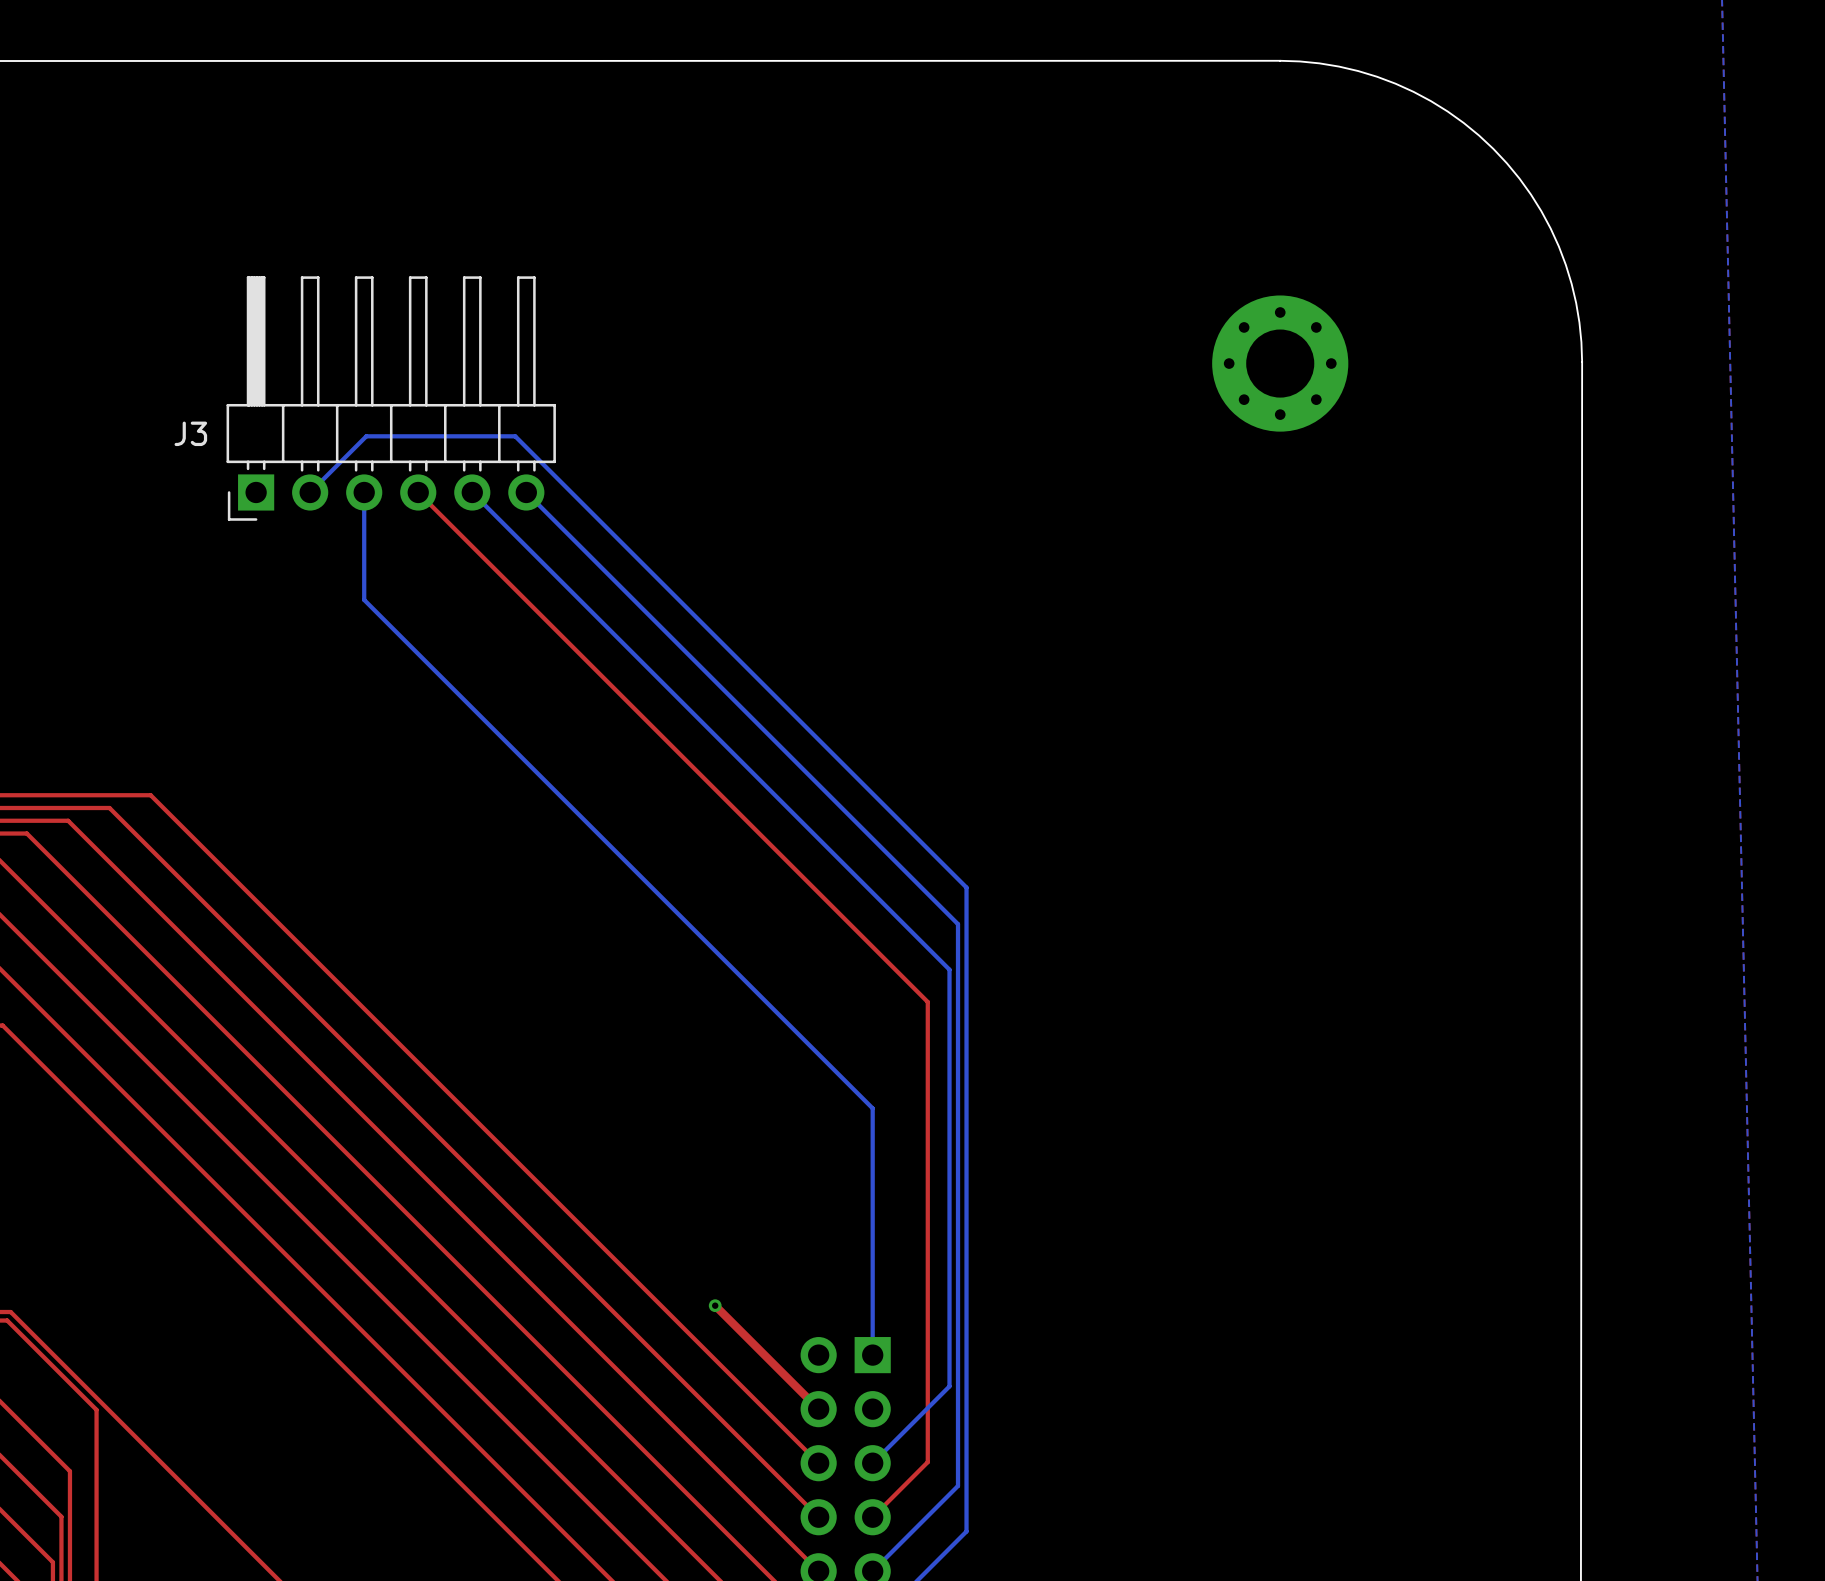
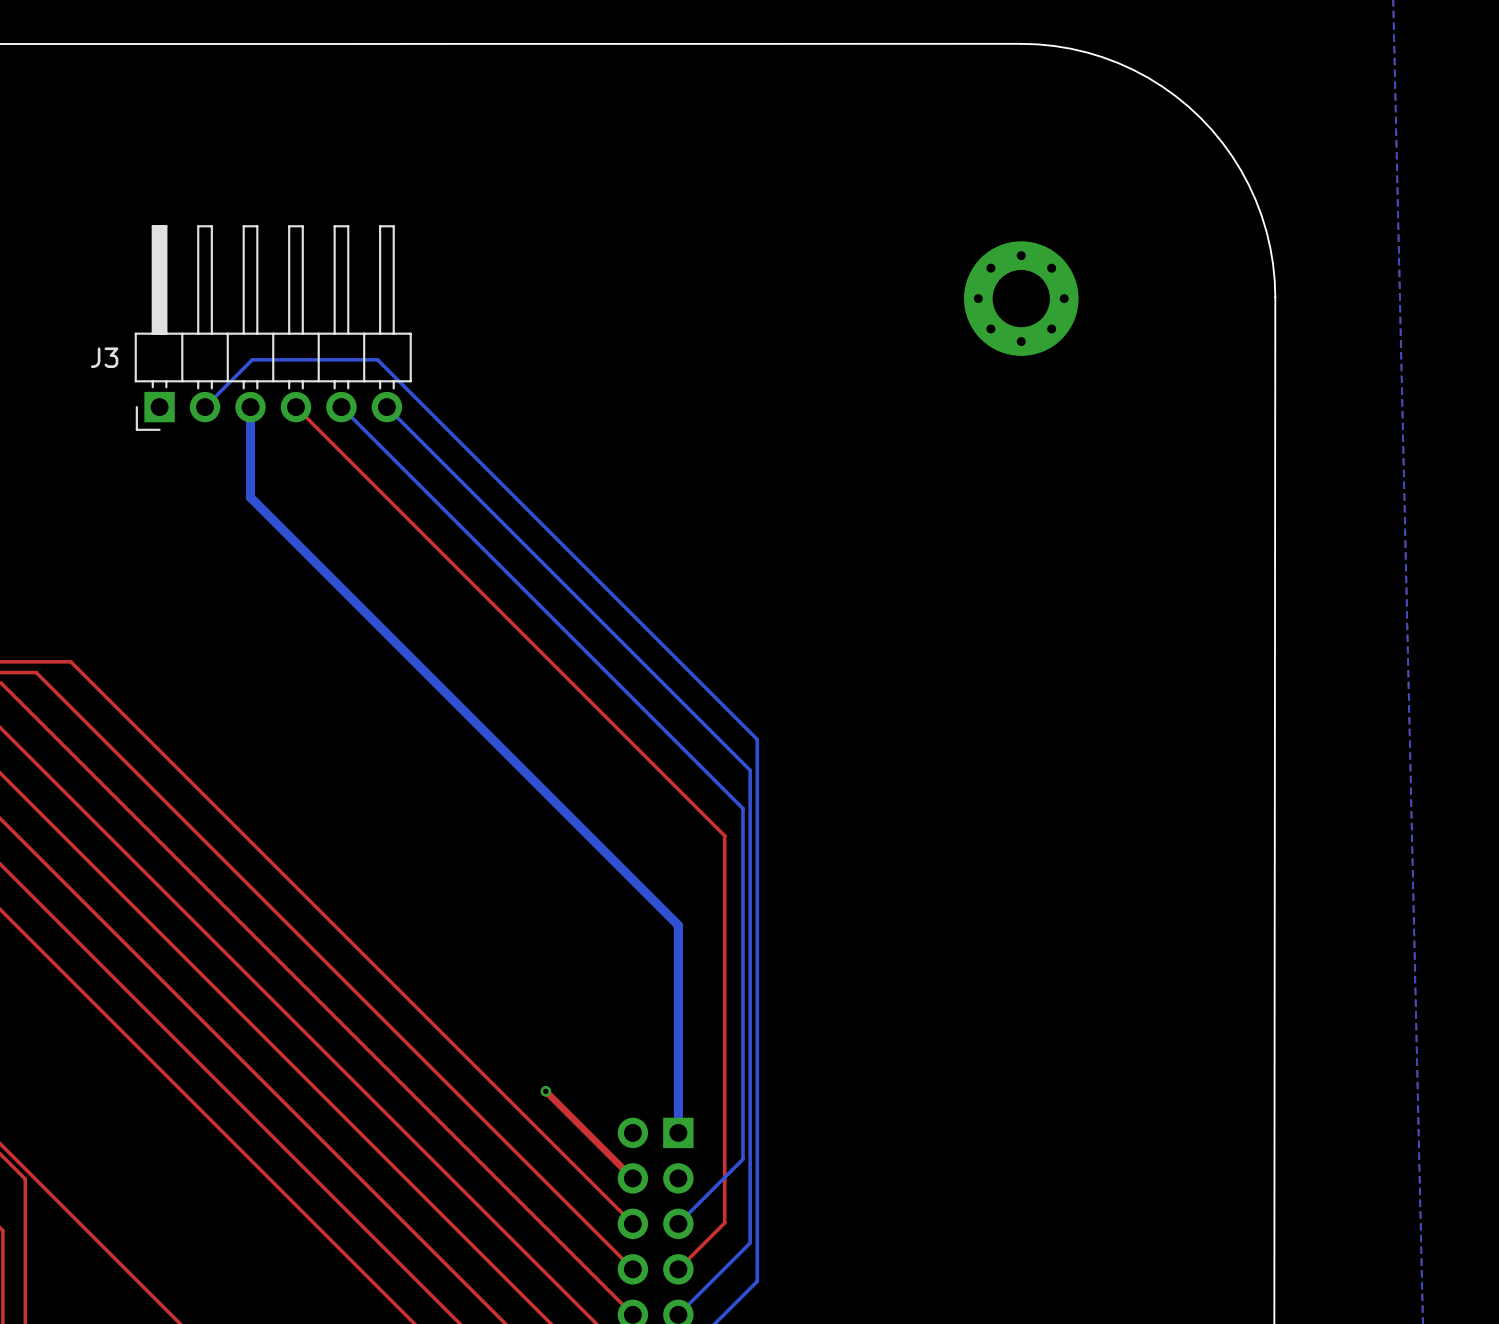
bottom track width: thin (364, 492) (364, 599) (872, 1108) (872, 1355) -> thick (250, 407) (250, 497) (678, 925) (678, 1132)

